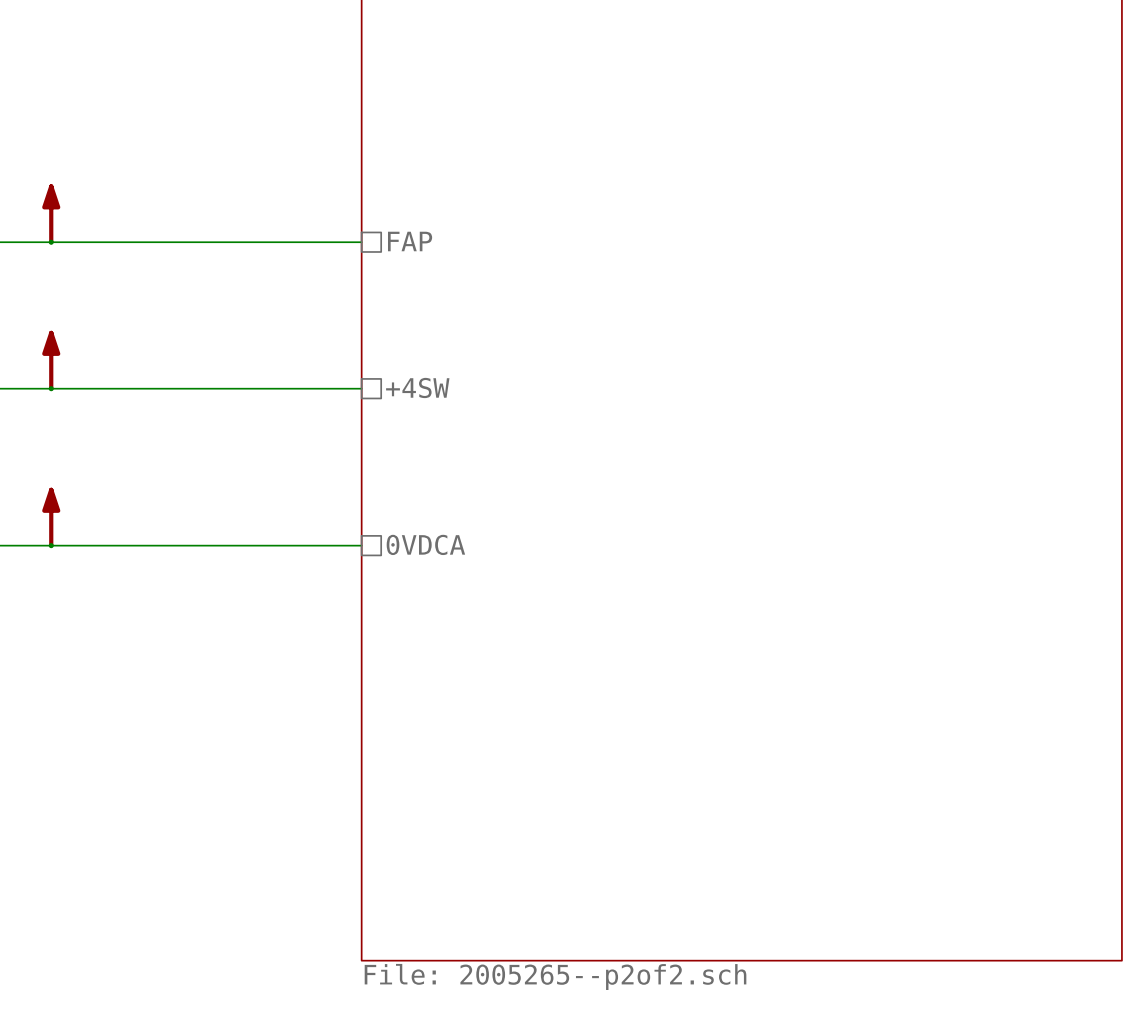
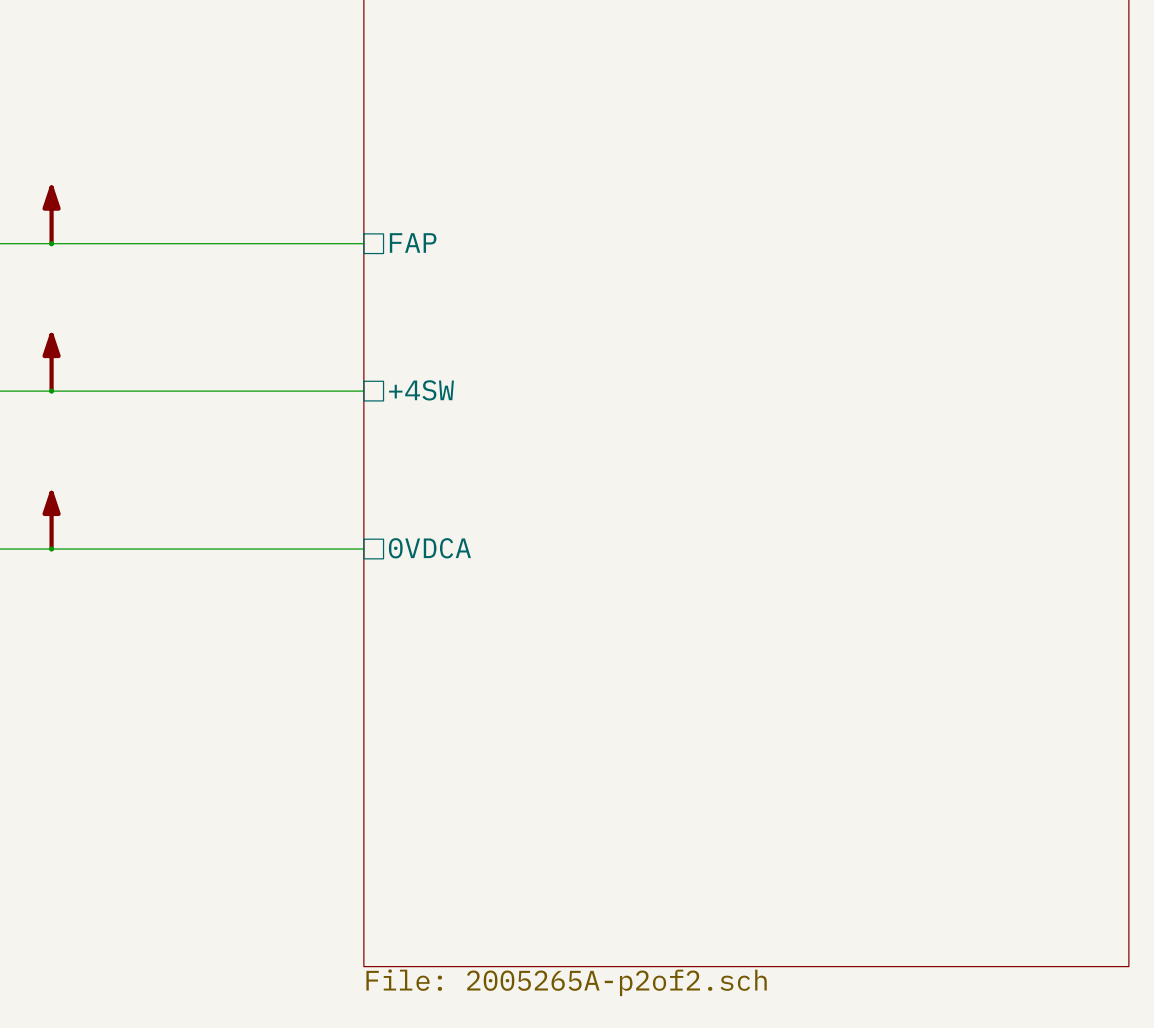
sheet value: File: 2005265--p2of2.sch (555, 976) -> File: 2005265A-p2of2.sch (566, 982)

